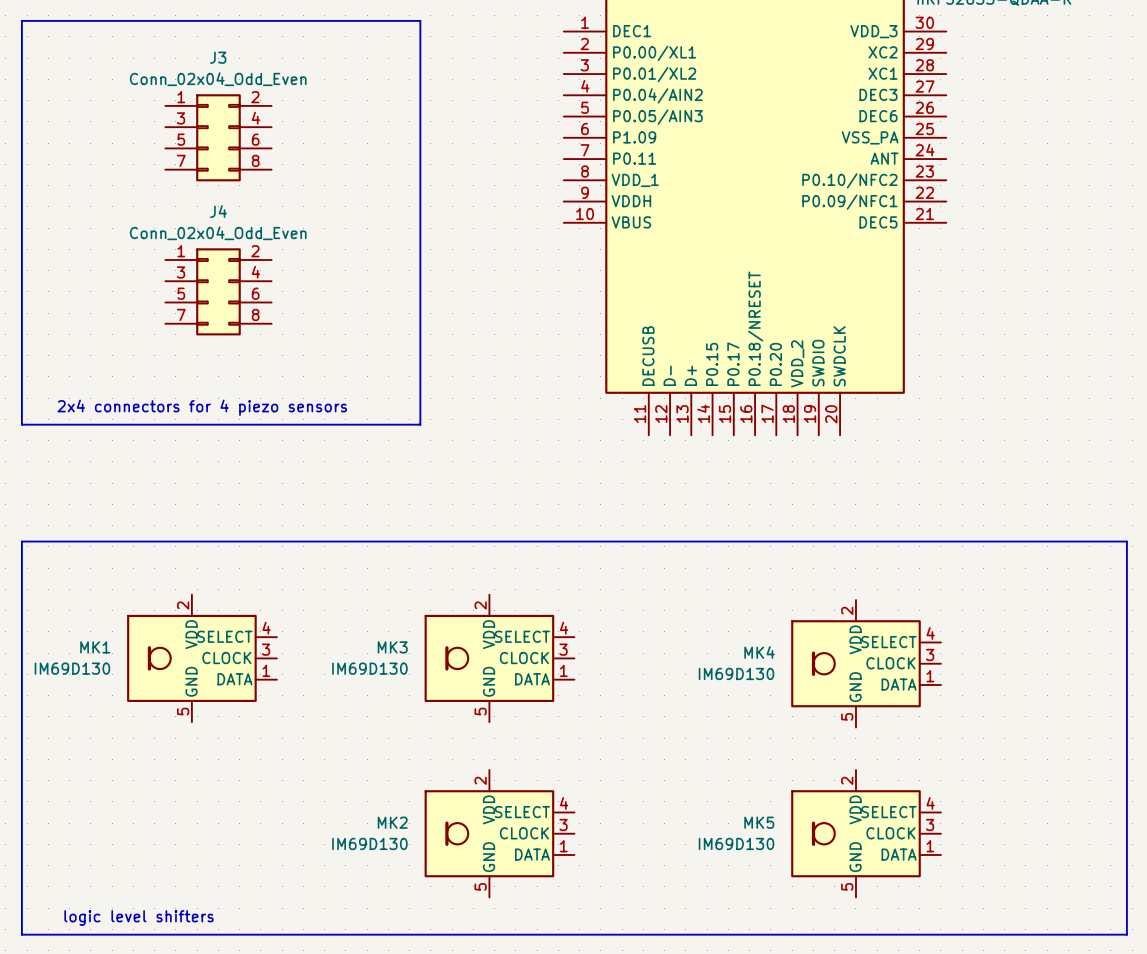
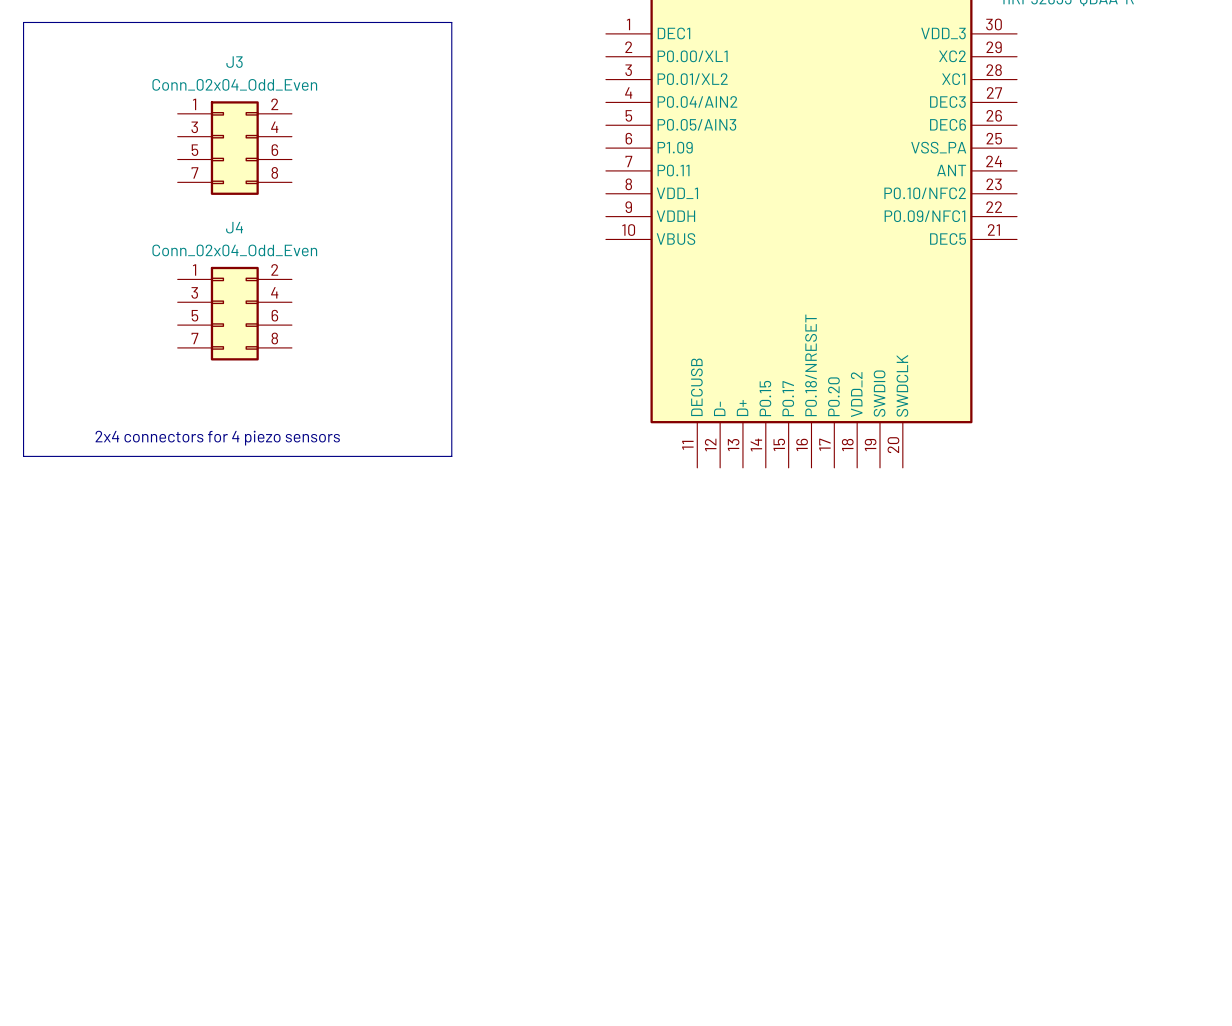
line: (21, 541) (1126, 541) (1126, 934) (21, 934) (21, 541) -> none
MK1: IM69D130 (202, 658) -> none
MK3: IM69D130 (499, 658) -> none
MK4: IM69D130 (866, 663) -> none
MK2: IM69D130 (499, 833) -> none
MK5: IM69D130 (866, 833) -> none
text: logic level shifters (139, 918) -> none

